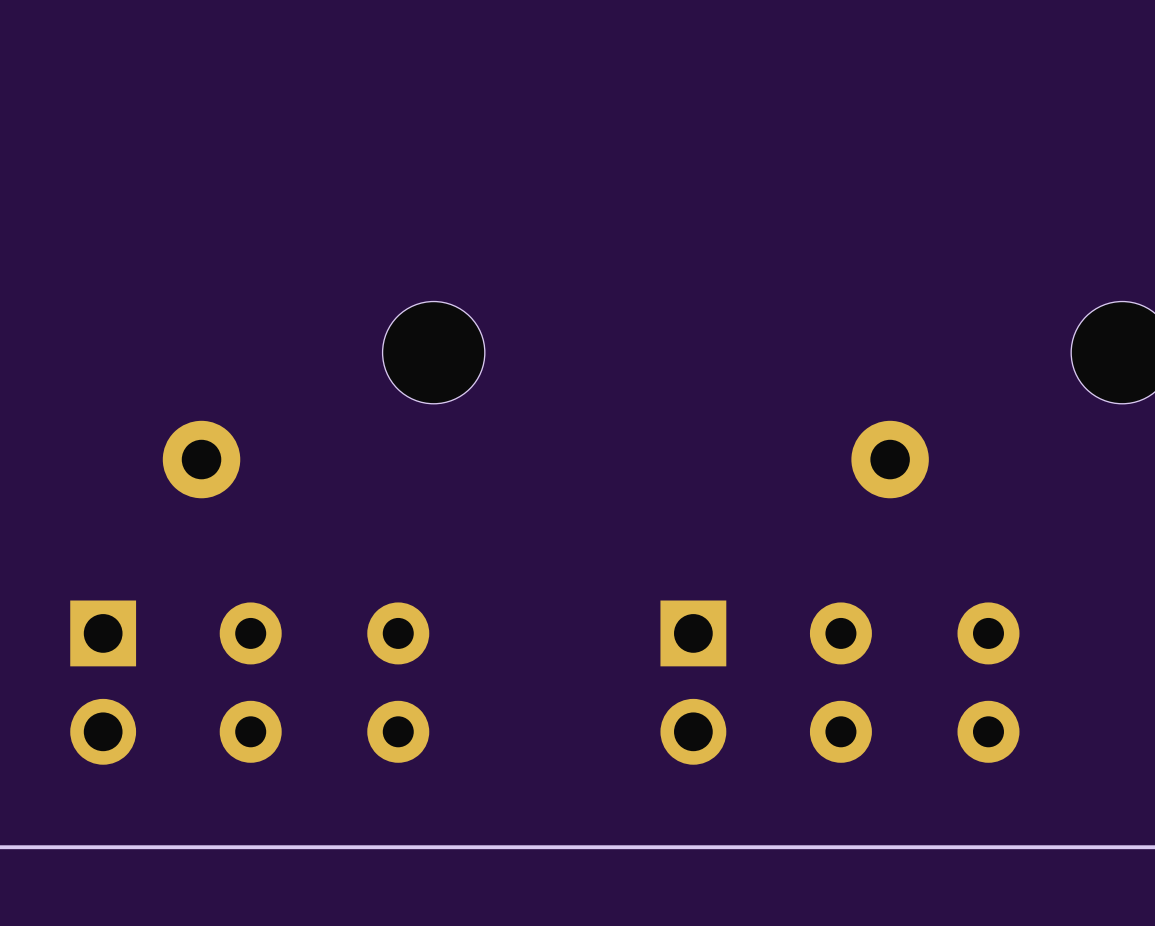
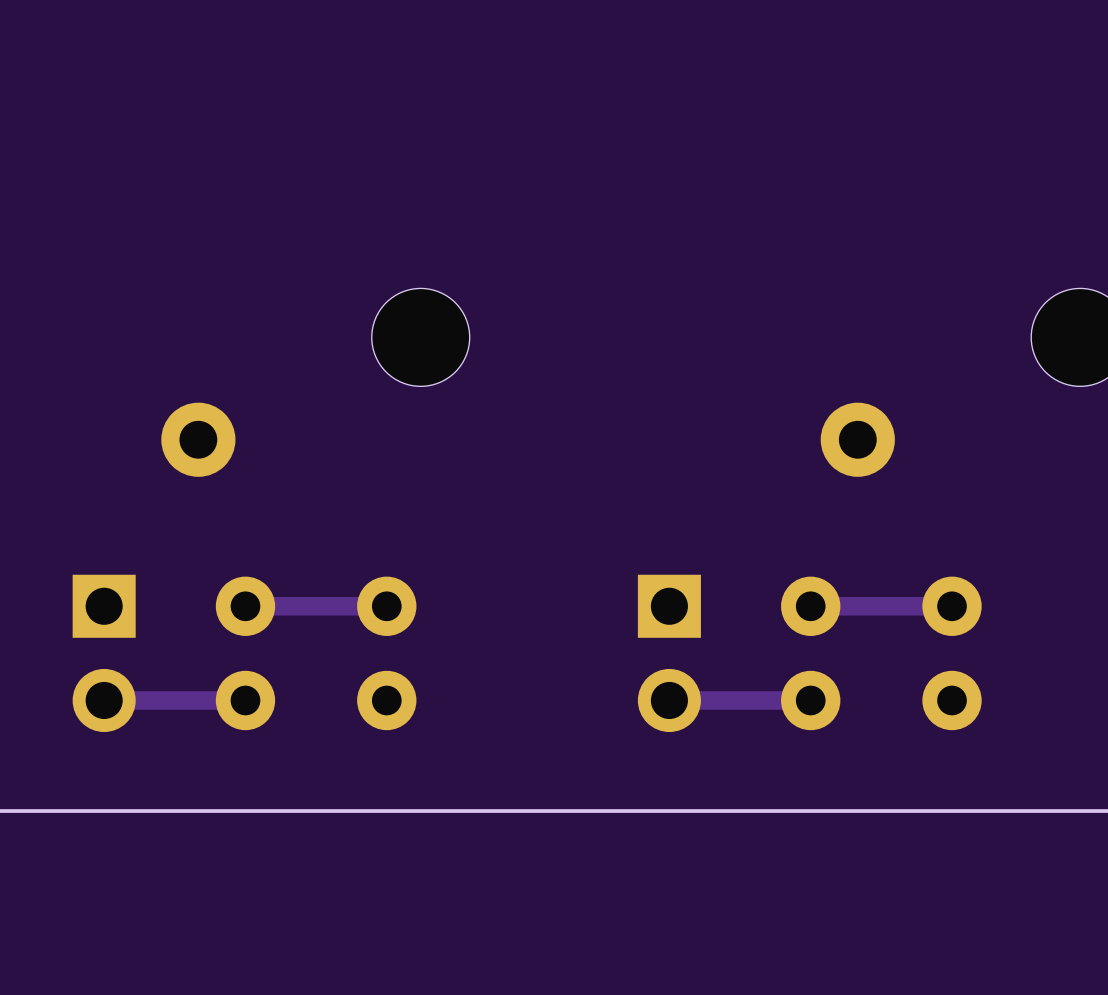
track: none -> (386, 606) (245, 606)
track: none -> (952, 606) (810, 606)
track: none -> (245, 700) (104, 700)
track: none -> (810, 700) (669, 700)

